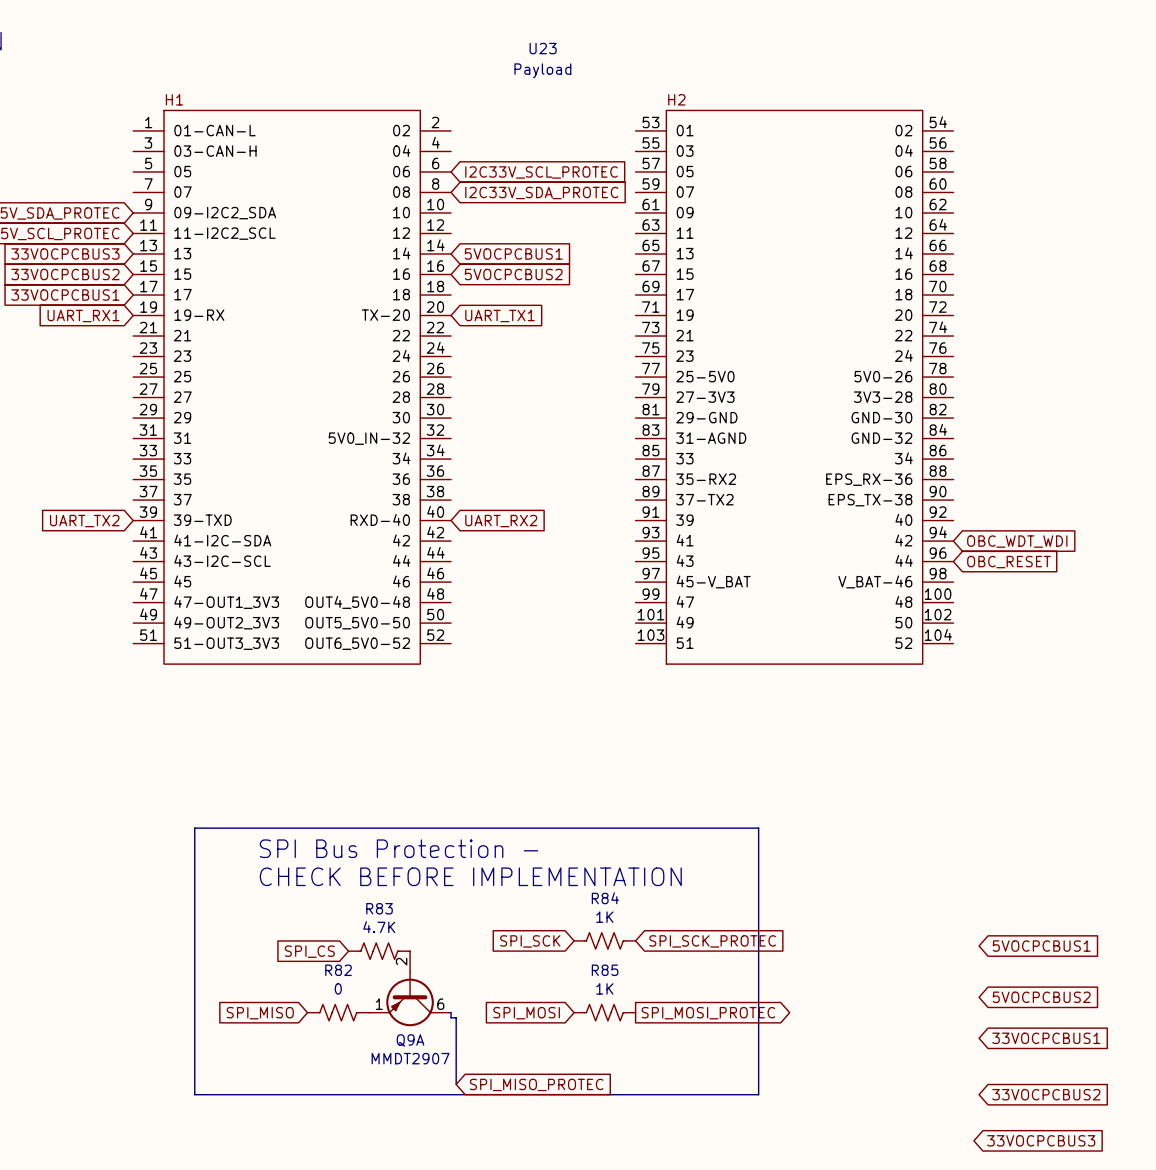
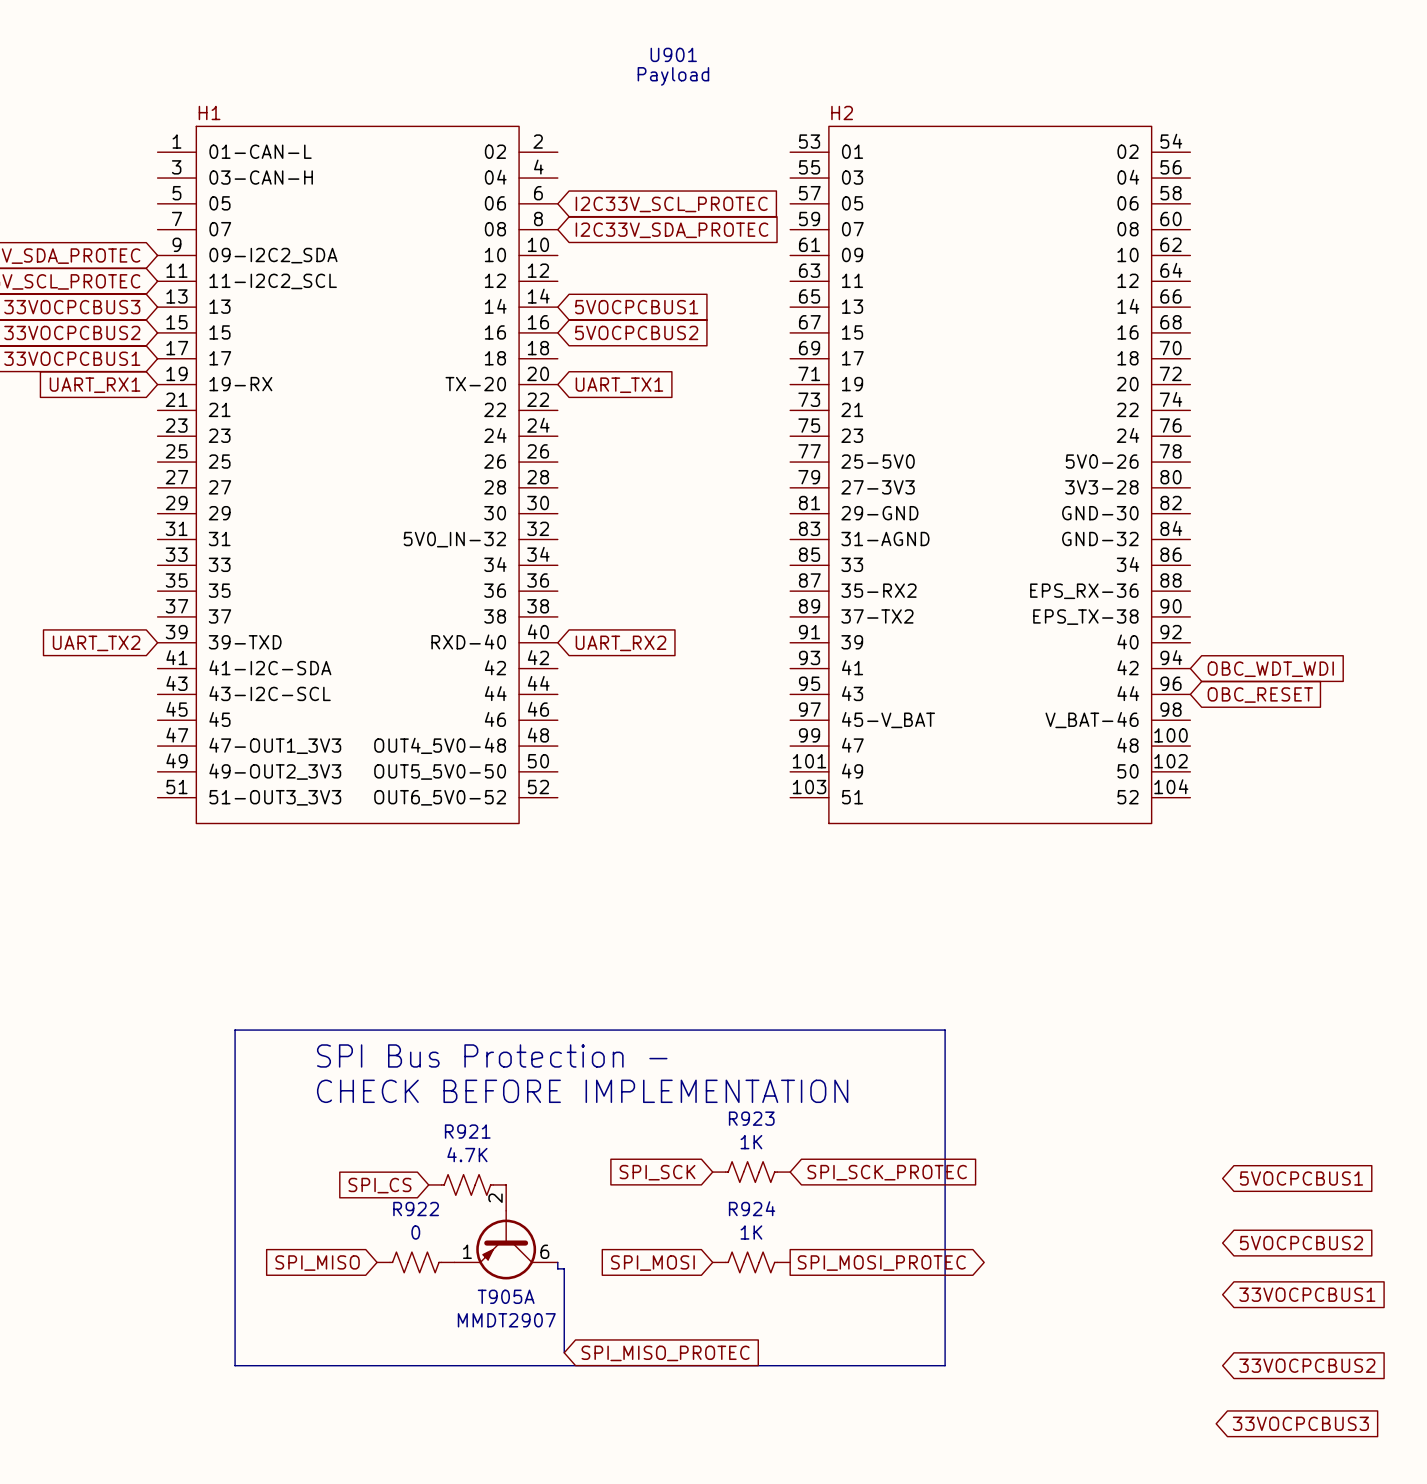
U23 name: U23 (543, 48) -> U901 (673, 54)
R84 name: R84 (605, 898) -> R923 (751, 1118)
R83 name: R83 (379, 908) -> R921 (467, 1131)
R82 name: R82 (338, 970) -> R922 (416, 1209)
R85 name: R85 (605, 970) -> R924 (752, 1208)
Q9A name: Q9A (410, 1040) -> T905A (506, 1296)

